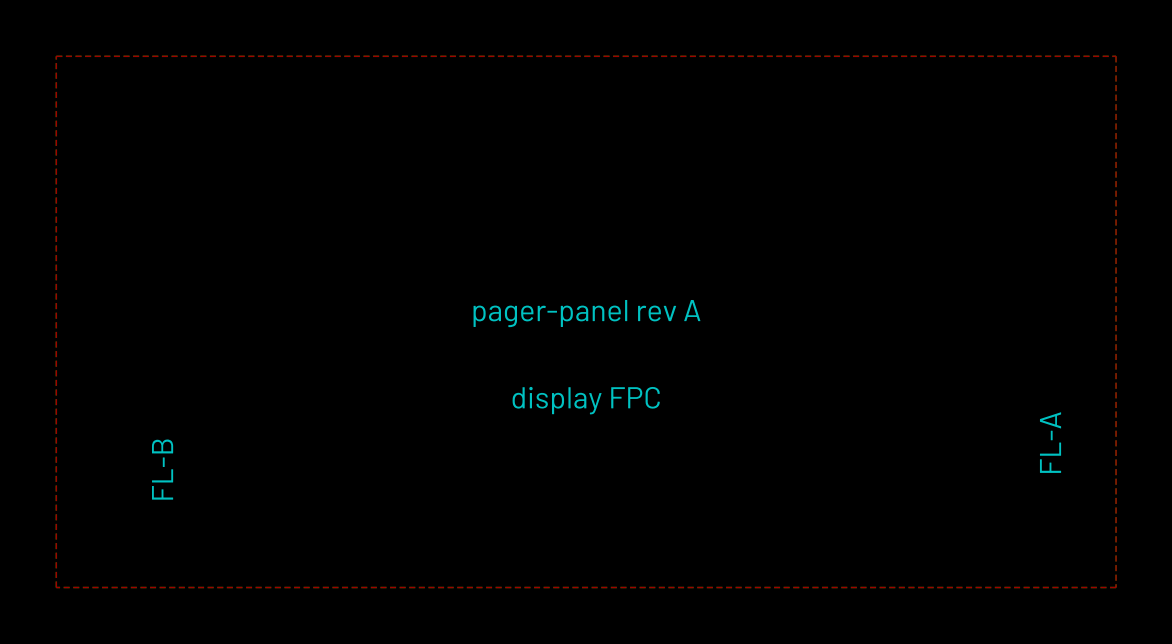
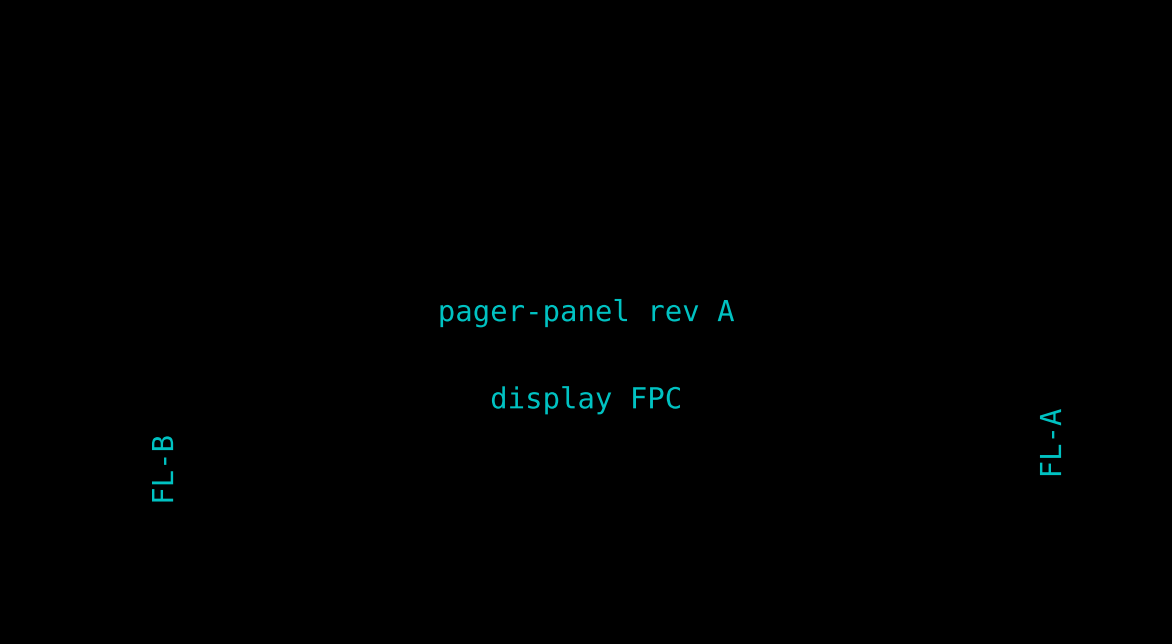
top zone outline: (56, 56) (1116, 56) (1116, 587) (56, 587) (56, 56) -> none

